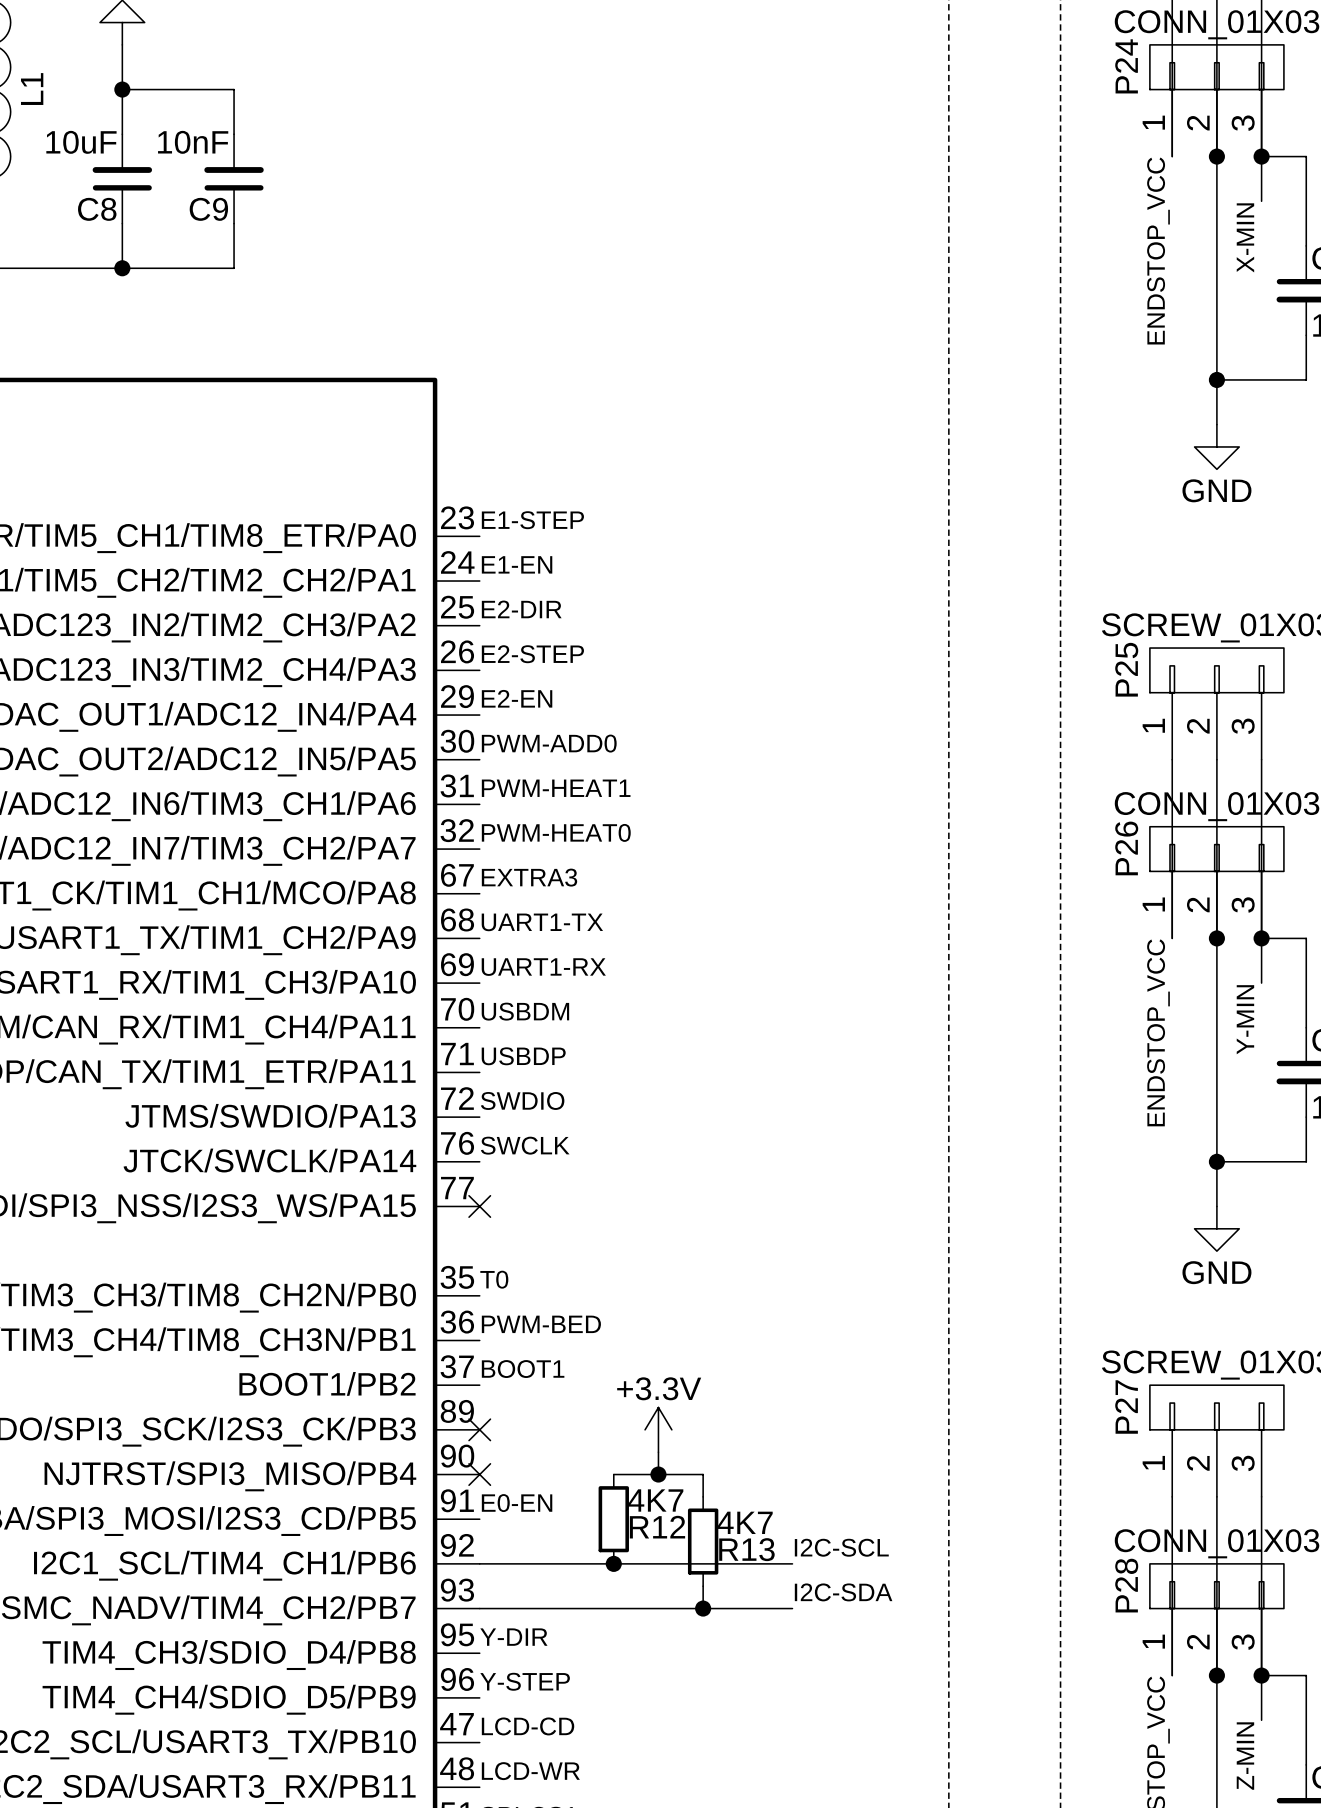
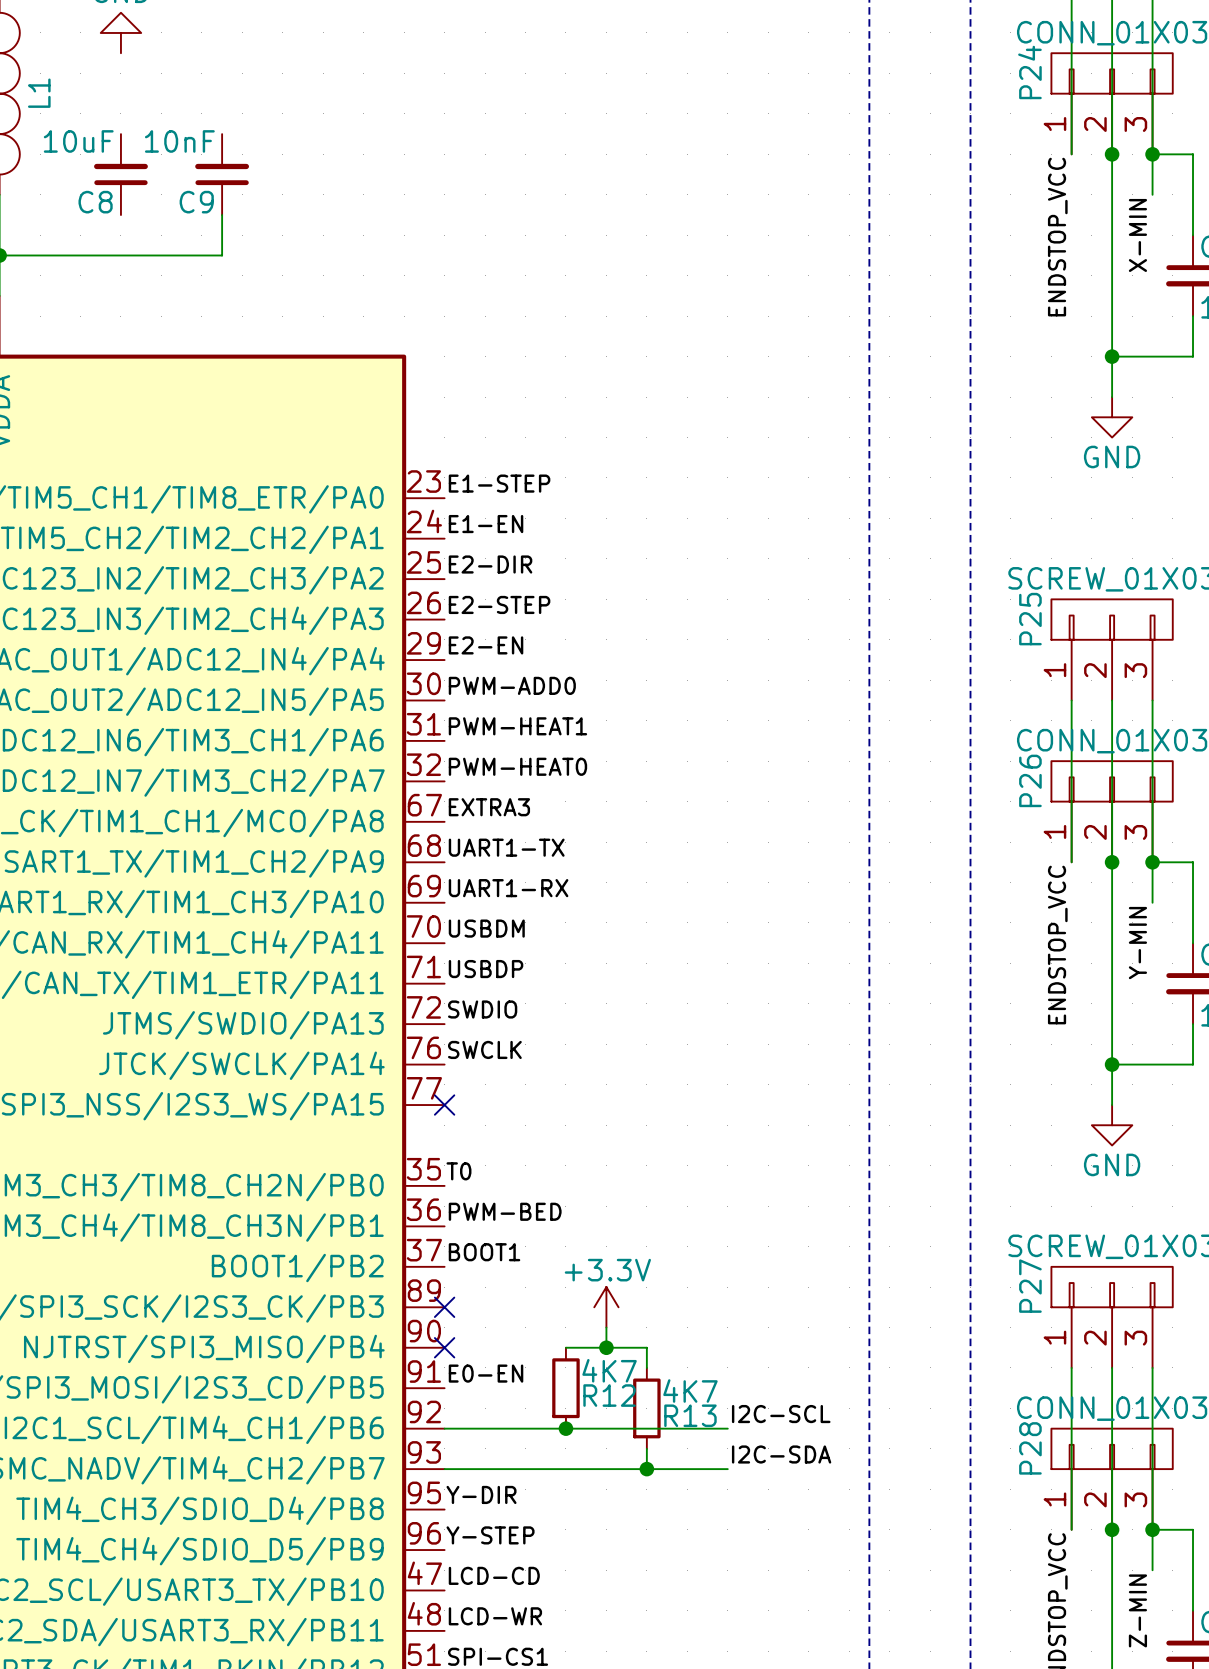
wire: (122, 44) (122, 134) -> none
wire: (122, 89) (234, 89) (234, 134) -> none
junction: (122, 89) -> none
wire: (122, 223) (122, 268) -> none
junction: (122, 268) -> none

